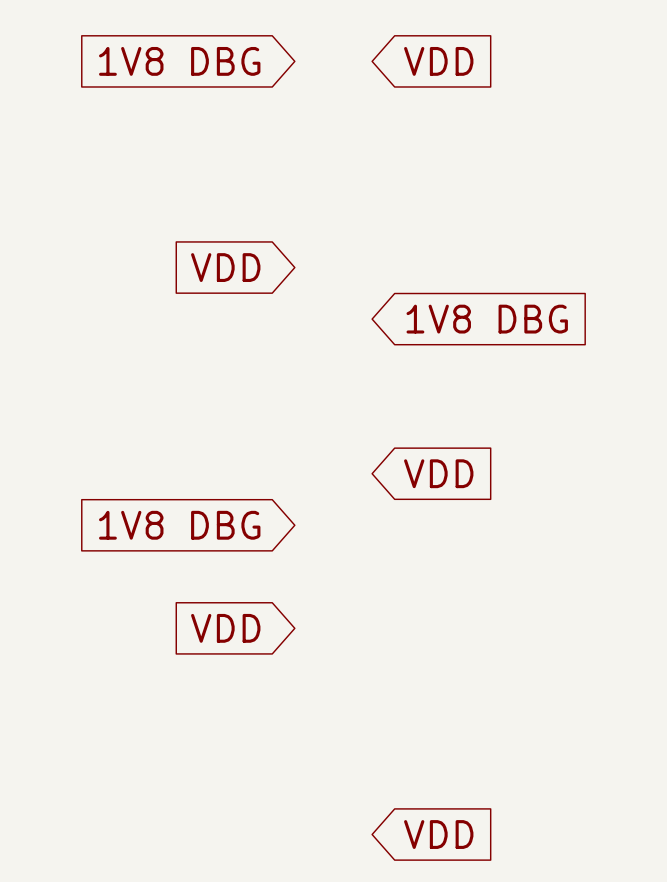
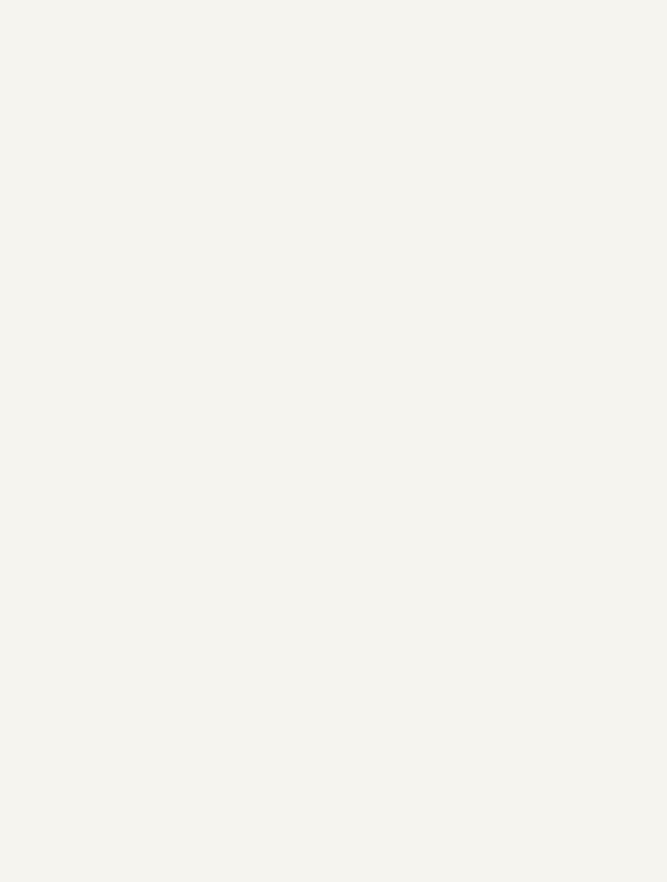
global label: 1V8 DBG (179, 61) -> none
global label: VDD (438, 61) -> none
global label: VDD (225, 267) -> none
global label: 1V8 DBG (487, 319) -> none
global label: VDD (438, 473) -> none
global label: 1V8 DBG (179, 525) -> none
global label: VDD (225, 628) -> none
global label: VDD (438, 834) -> none

